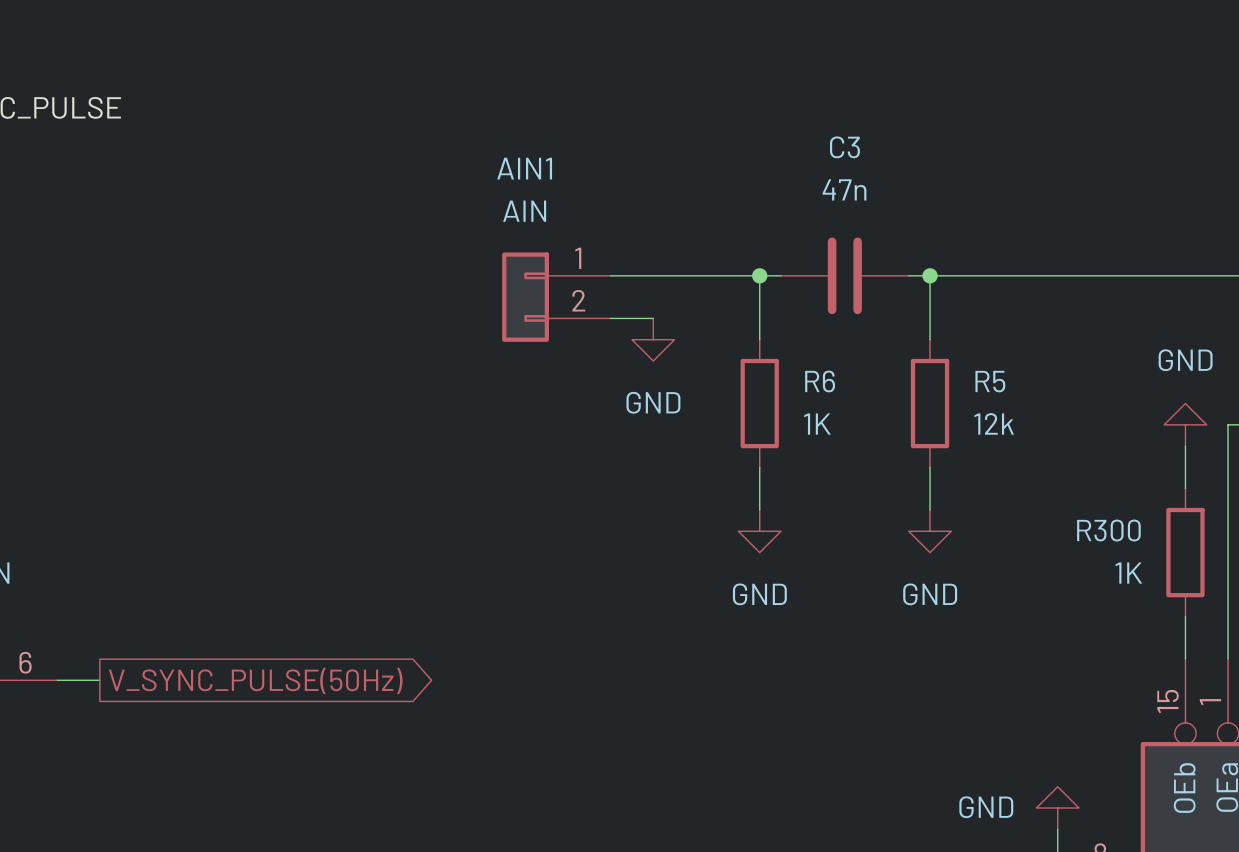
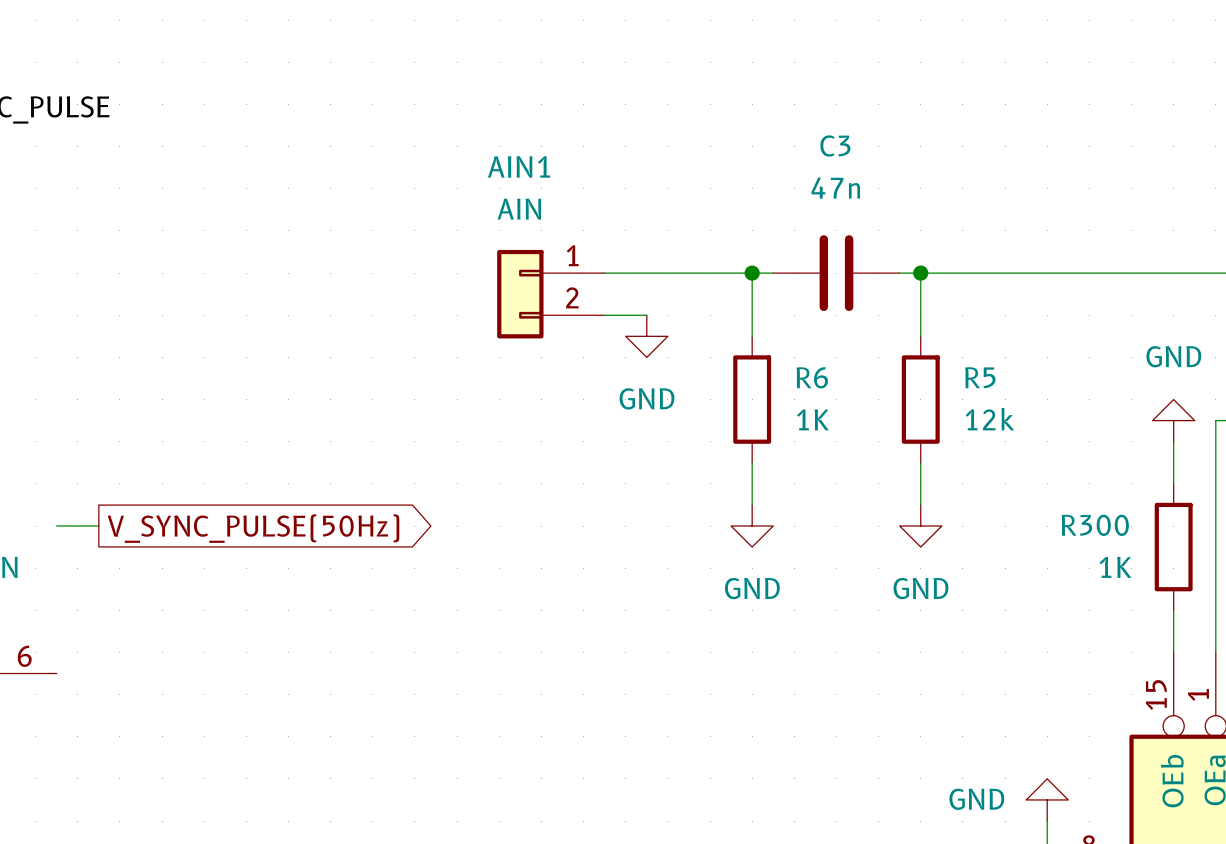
wire: (57, 680) (99, 680) -> (56, 526) (98, 526)
global label position: V_SYNC_PULSE(50Hz) (255, 680) -> V_SYNC_PULSE(50Hz) (253, 528)

